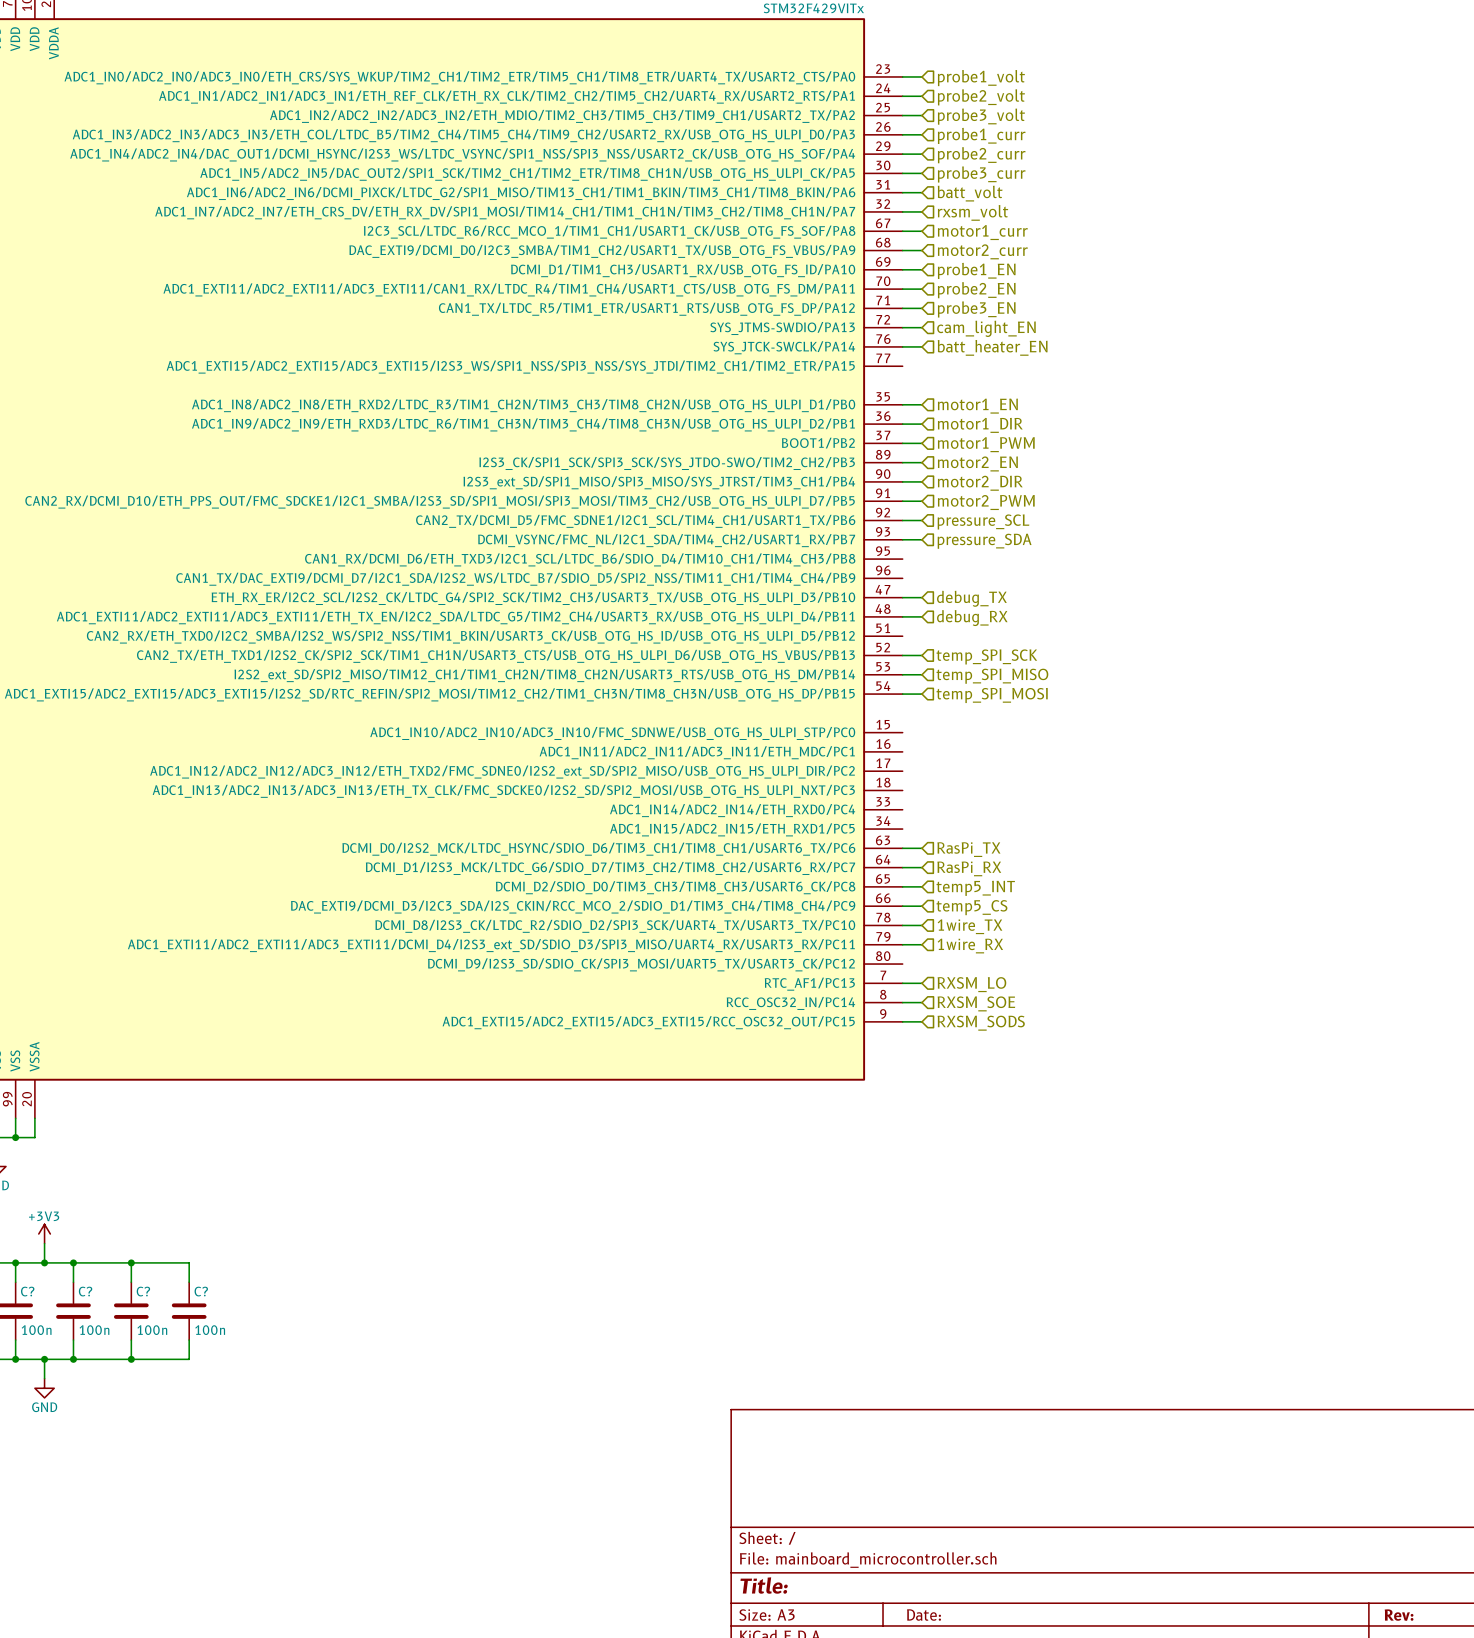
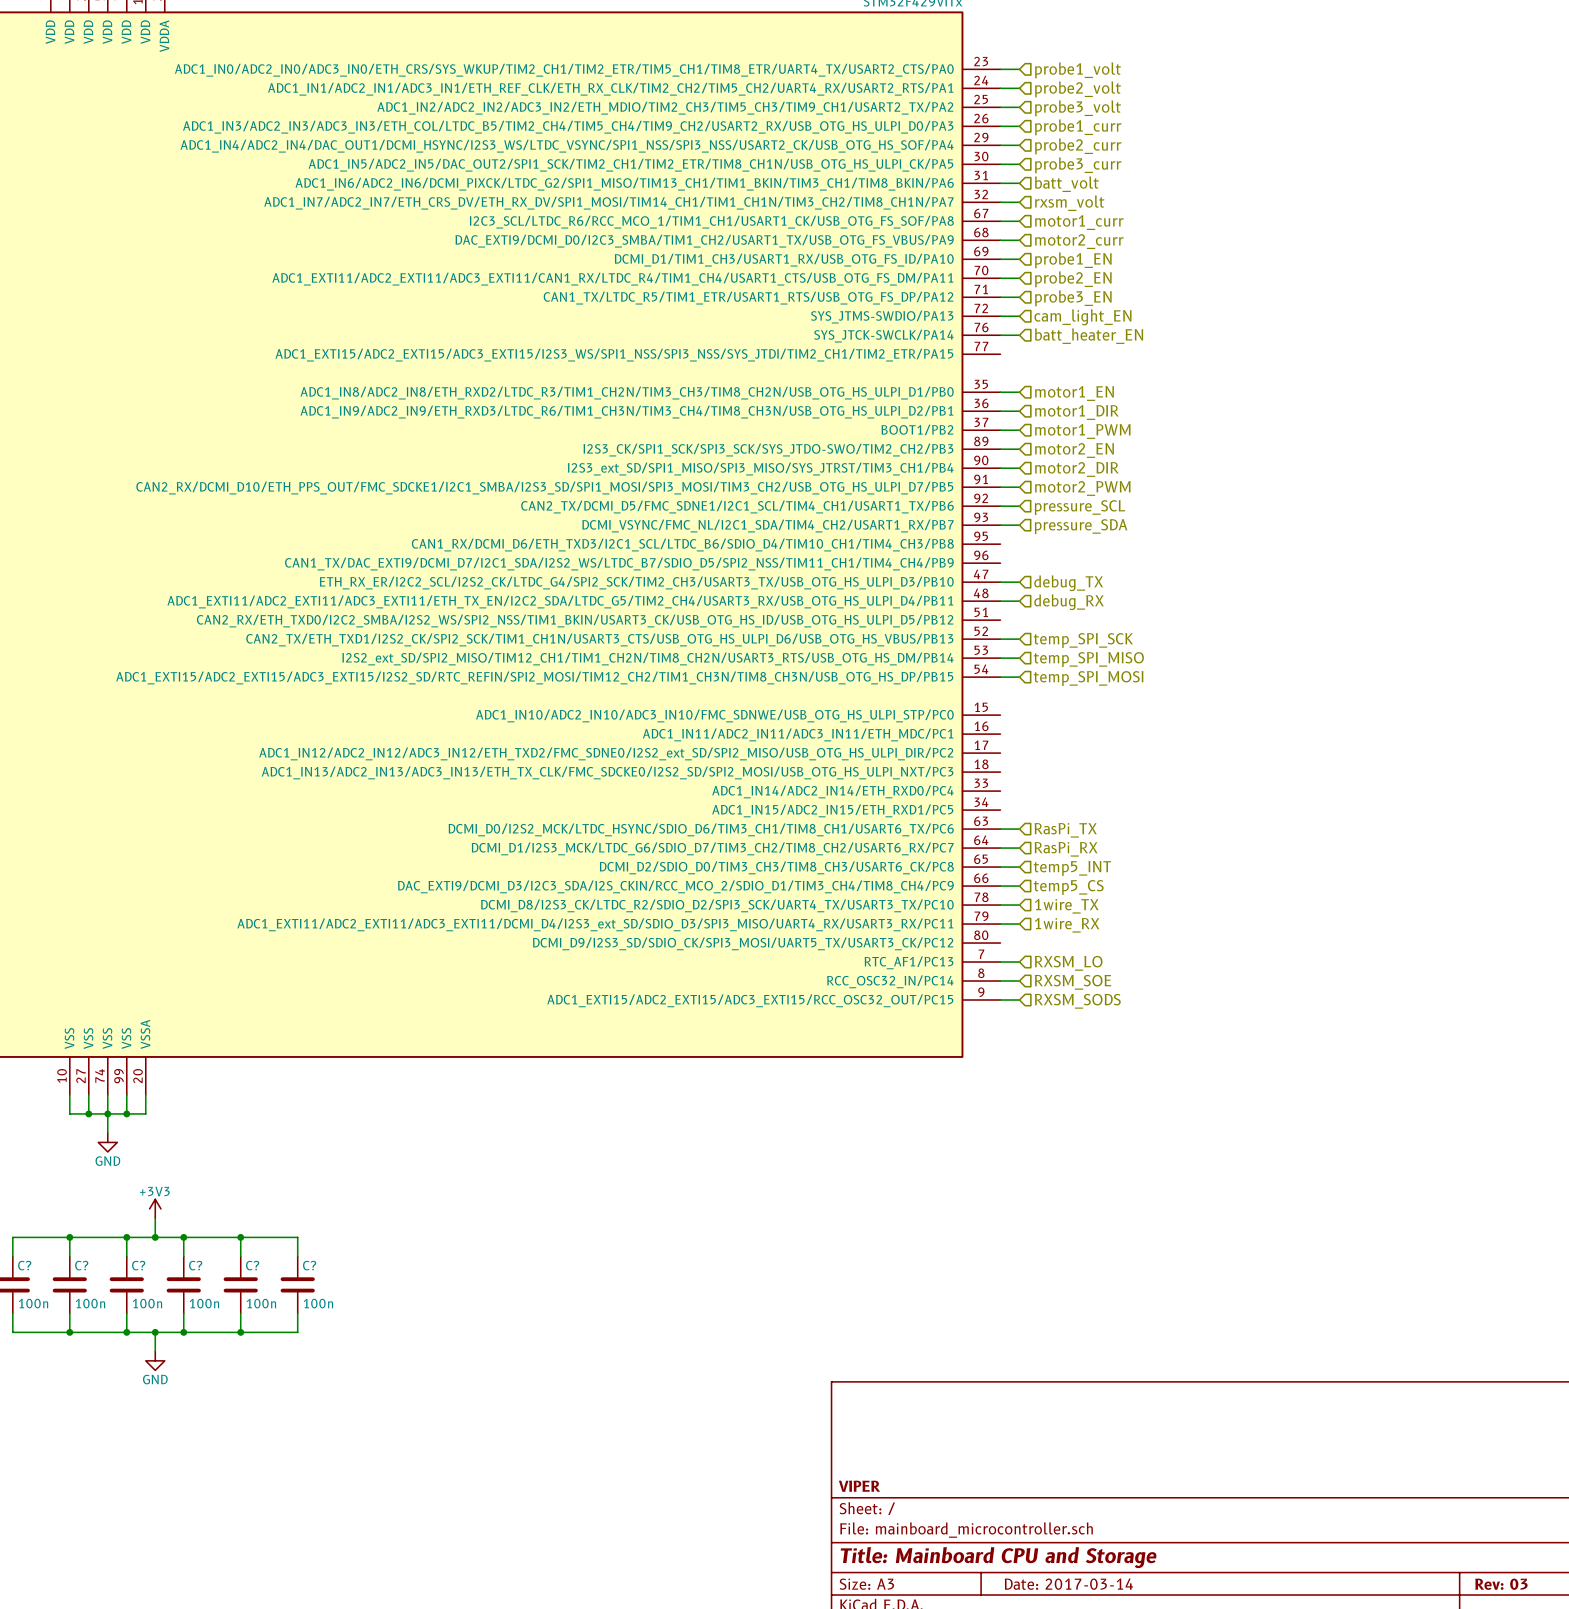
title block: none -> VIPER (859, 1486)
title block: Title: (764, 1585) -> Title: Mainboard CPU and Storage (998, 1557)
title block: Date: (924, 1615) -> Date: 2017-03-14 (1068, 1584)
title block: Rev: (1399, 1615) -> Rev: 03 (1501, 1584)

